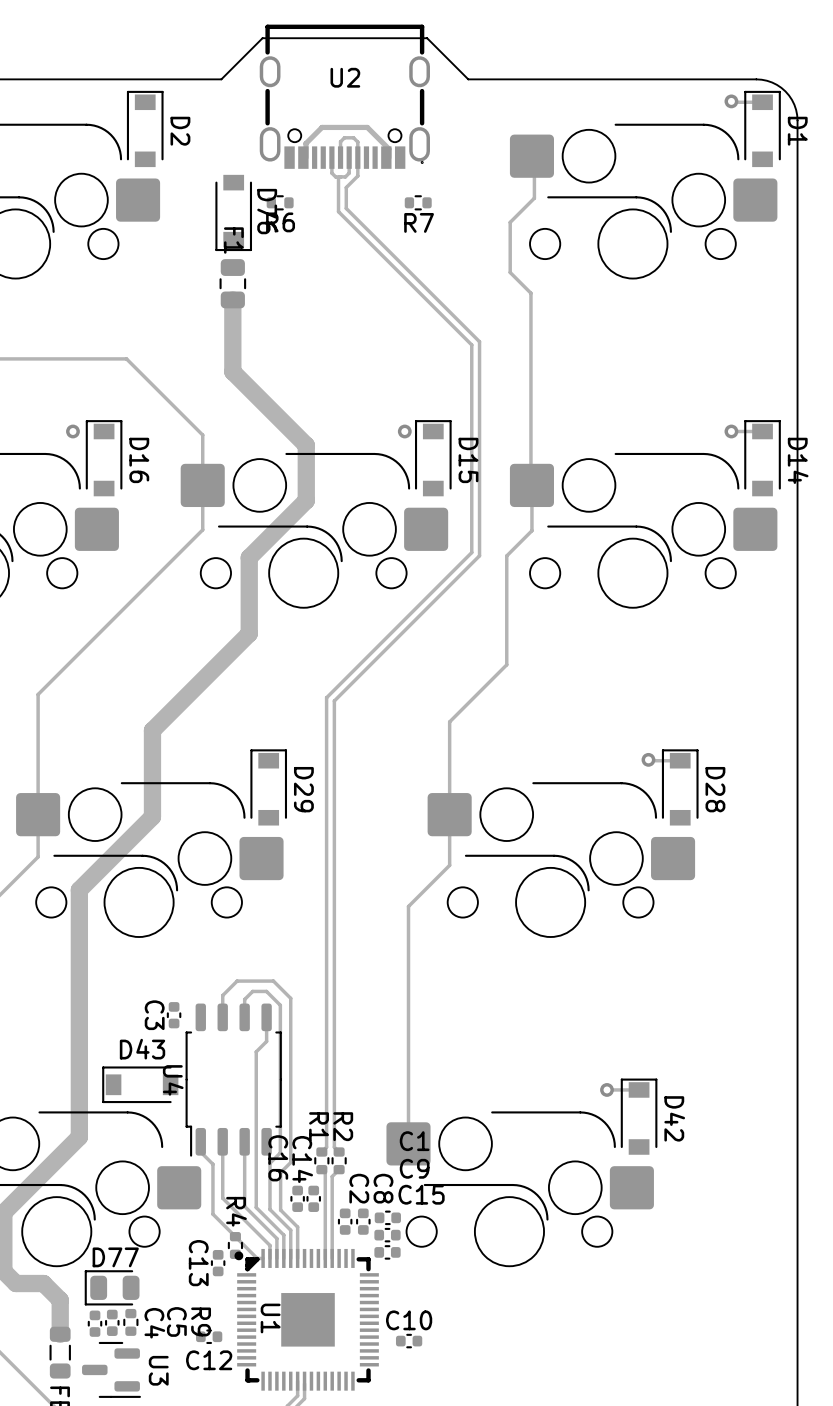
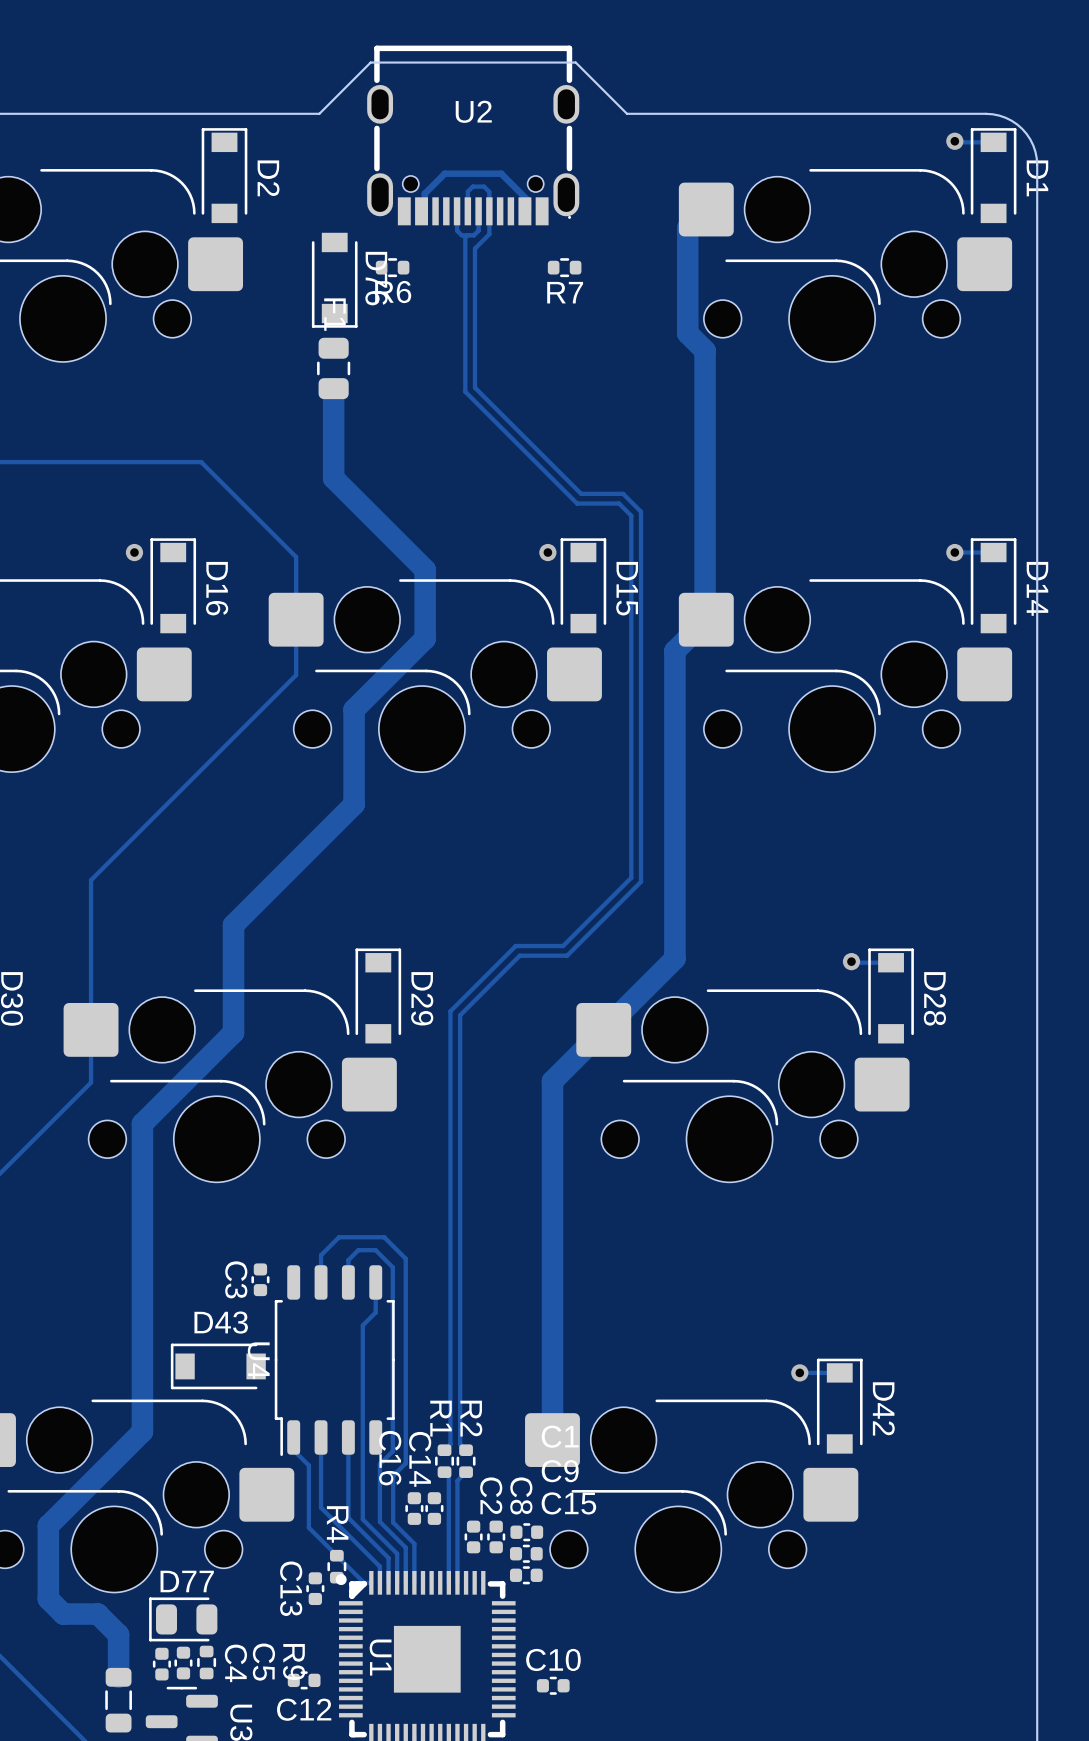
track: (531, 156) (534, 158) (534, 198) (510, 222) (510, 272) (530, 293) -> (706, 209) (687, 228) (687, 333) (705, 350) (705, 380)
track: (346, 208) (479, 341) (479, 398) -> (475, 274) (475, 387) (581, 493) (623, 493) (641, 511)
track: (338, 211) (471, 344) (471, 402) -> (465, 278) (465, 391) (577, 503) (619, 503) (631, 515)
track width: thin (530, 293) (531, 485) -> thick (705, 380) (706, 619)
track: (531, 485) (531, 530) (506, 555) -> (706, 619) (674, 651) (674, 707)
track: (471, 552) (326, 697) (326, 799) -> (631, 703) (631, 877) (563, 946) (515, 946) (450, 1011)
track: (479, 555) (334, 700) (334, 802) -> (641, 707) (641, 881) (567, 955) (519, 955) (460, 1015)
track width: thin (506, 555) (506, 664) -> thick (674, 707) (674, 843)
track: (506, 664) (449, 721) (449, 865) (408, 906) -> (674, 843) (674, 958) (552, 1081) (552, 1144)
track width: thin (408, 906) (408, 1143) -> thick (552, 1144) (552, 1440)

